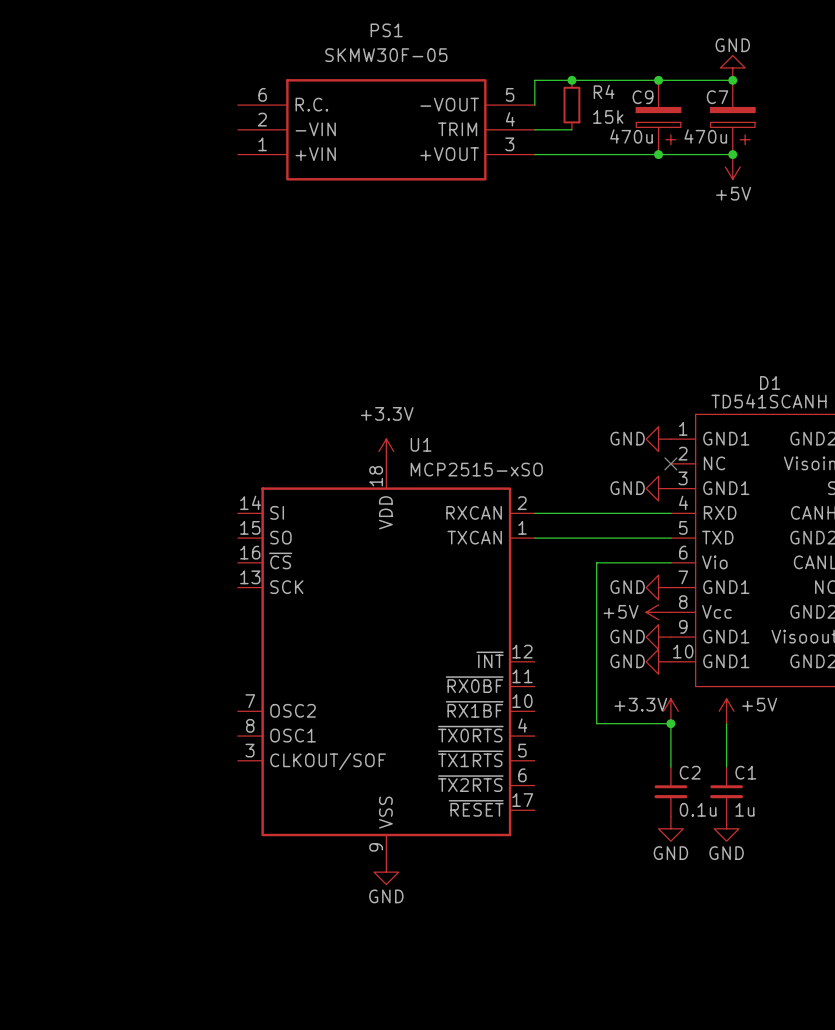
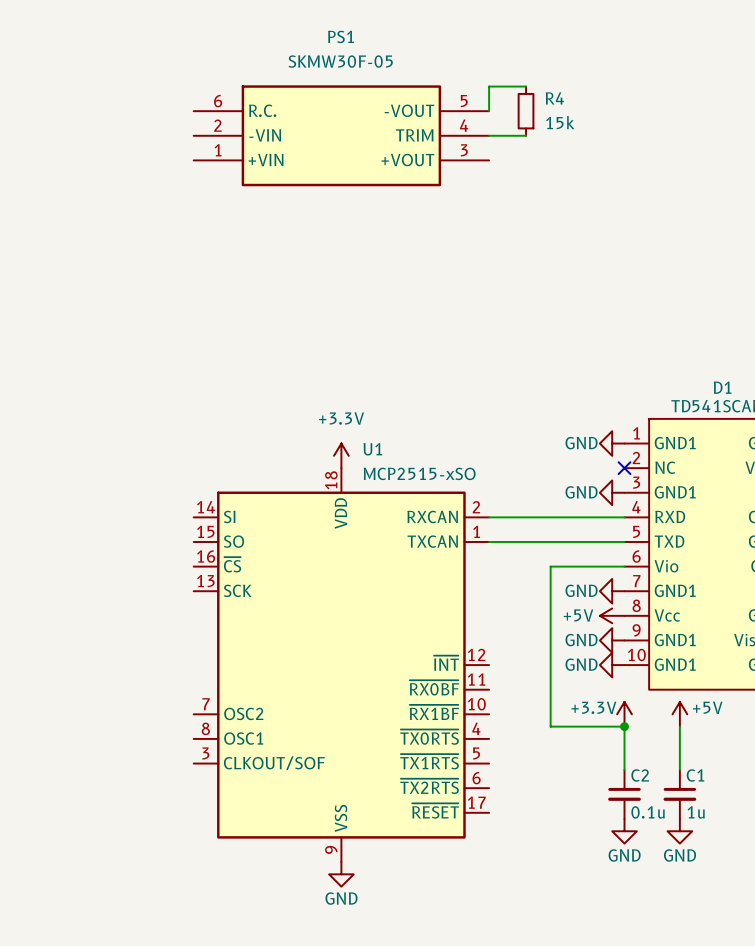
power symbol: GND (732, 67) -> none
wire: (571, 80) (732, 80) -> none
junction: (571, 80) -> none
junction: (658, 80) -> none
junction: (732, 80) -> none
C9: 470u (658, 117) -> none
C7: 470u (732, 117) -> none
wire: (534, 154) (732, 154) -> none
junction: (658, 154) -> none
junction: (732, 154) -> none
power symbol: +5V (732, 166) -> none

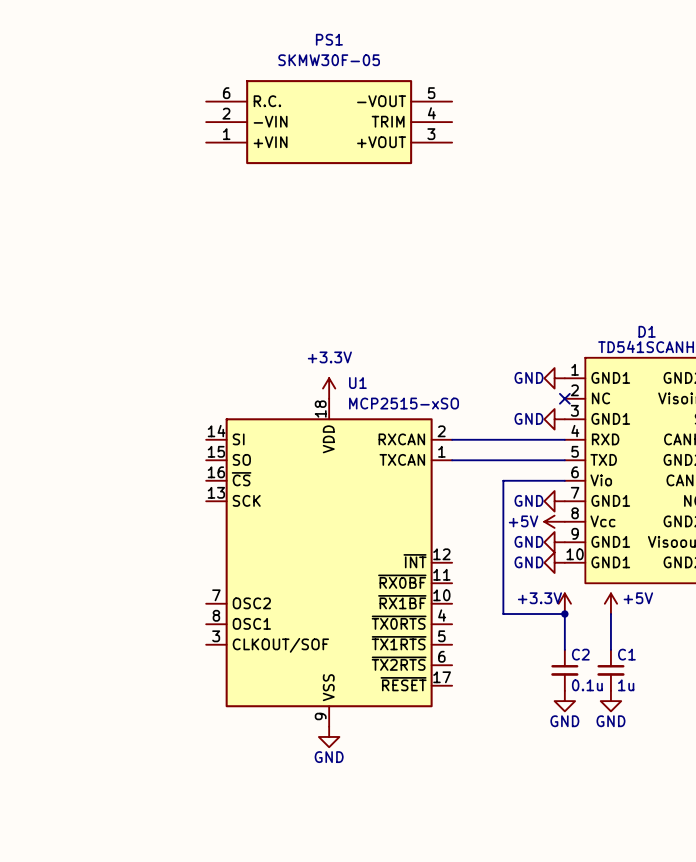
wire: (526, 86) (489, 86) (489, 111) -> none
R4: 15k (526, 111) -> none
wire: (489, 135) (526, 135) -> none

